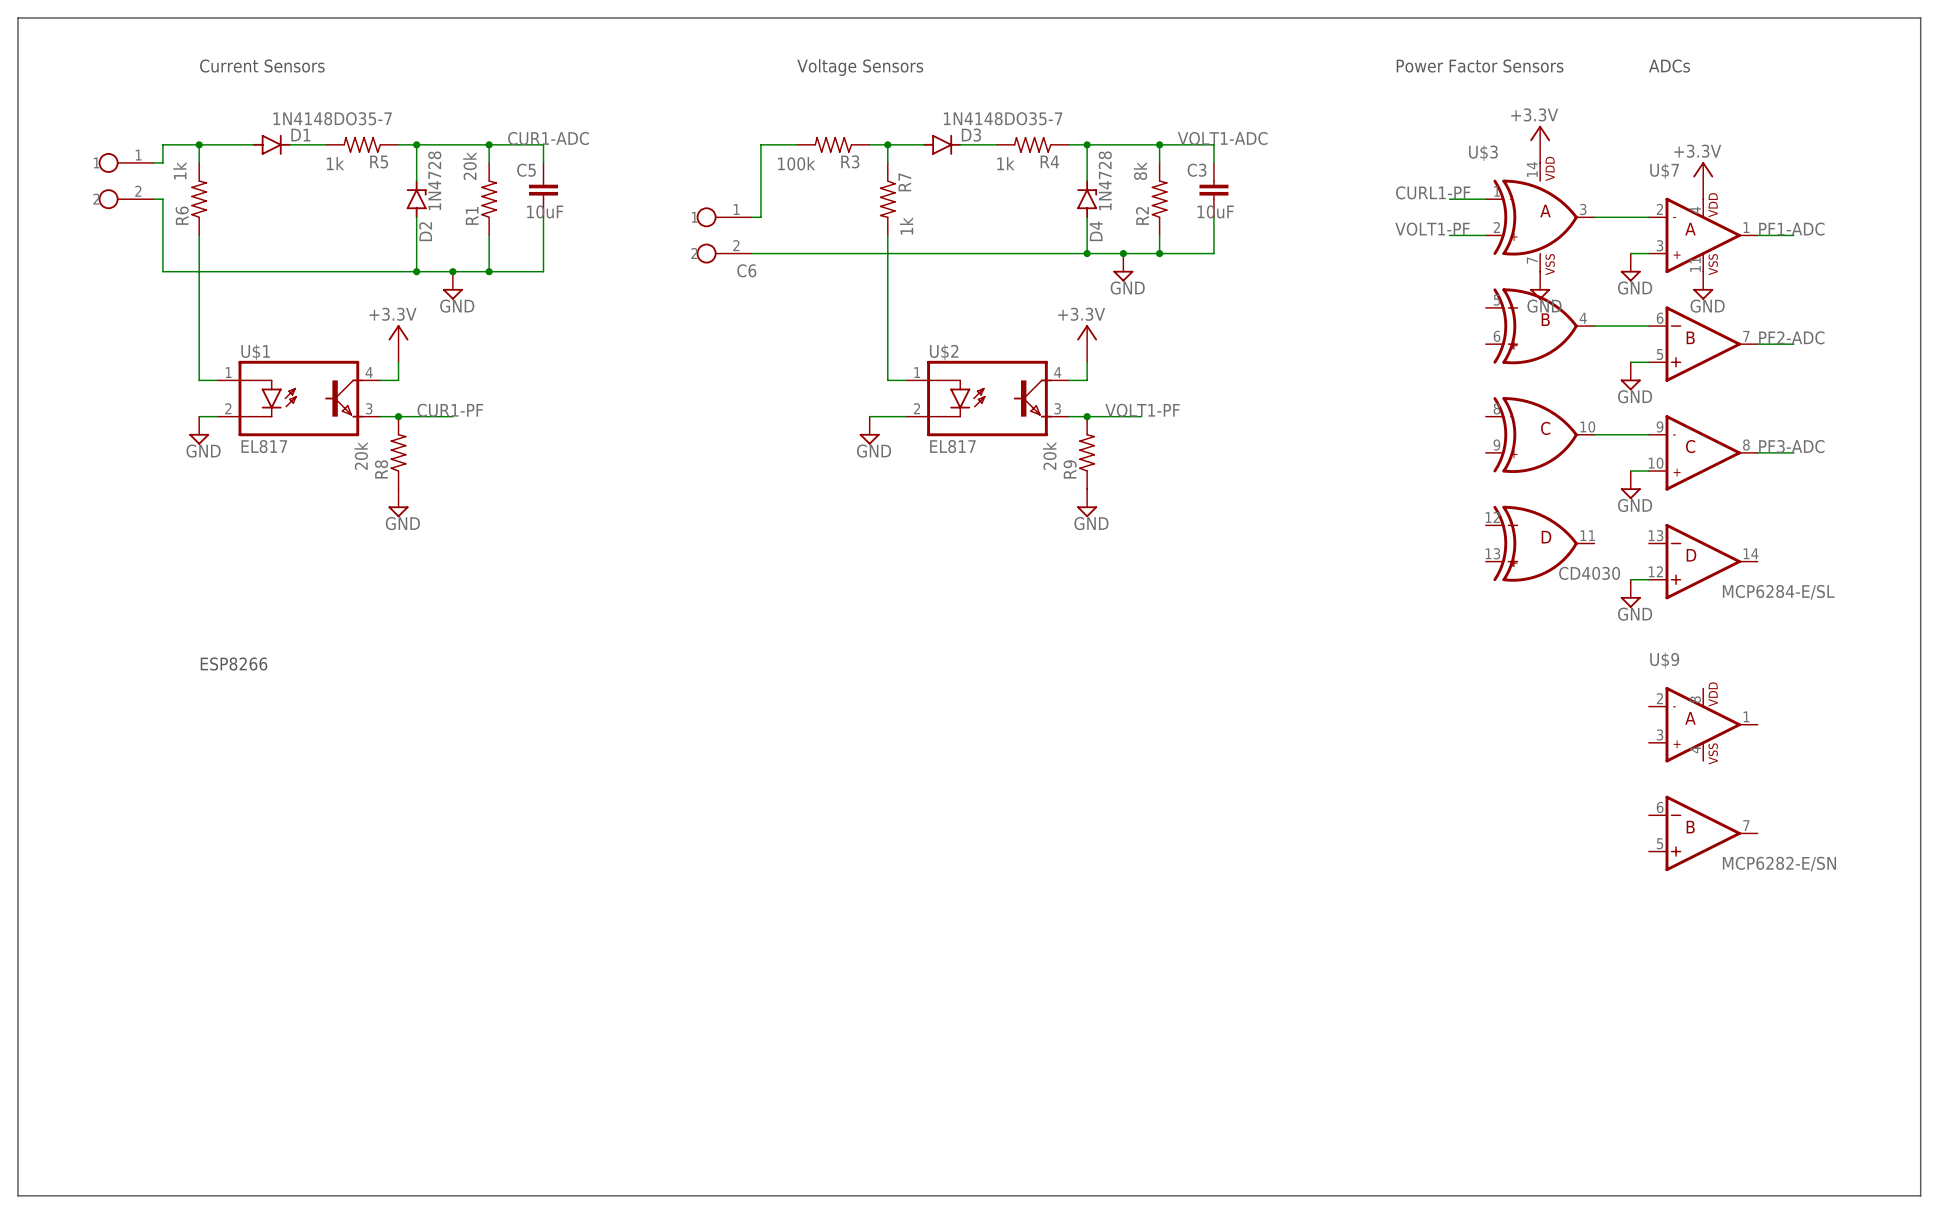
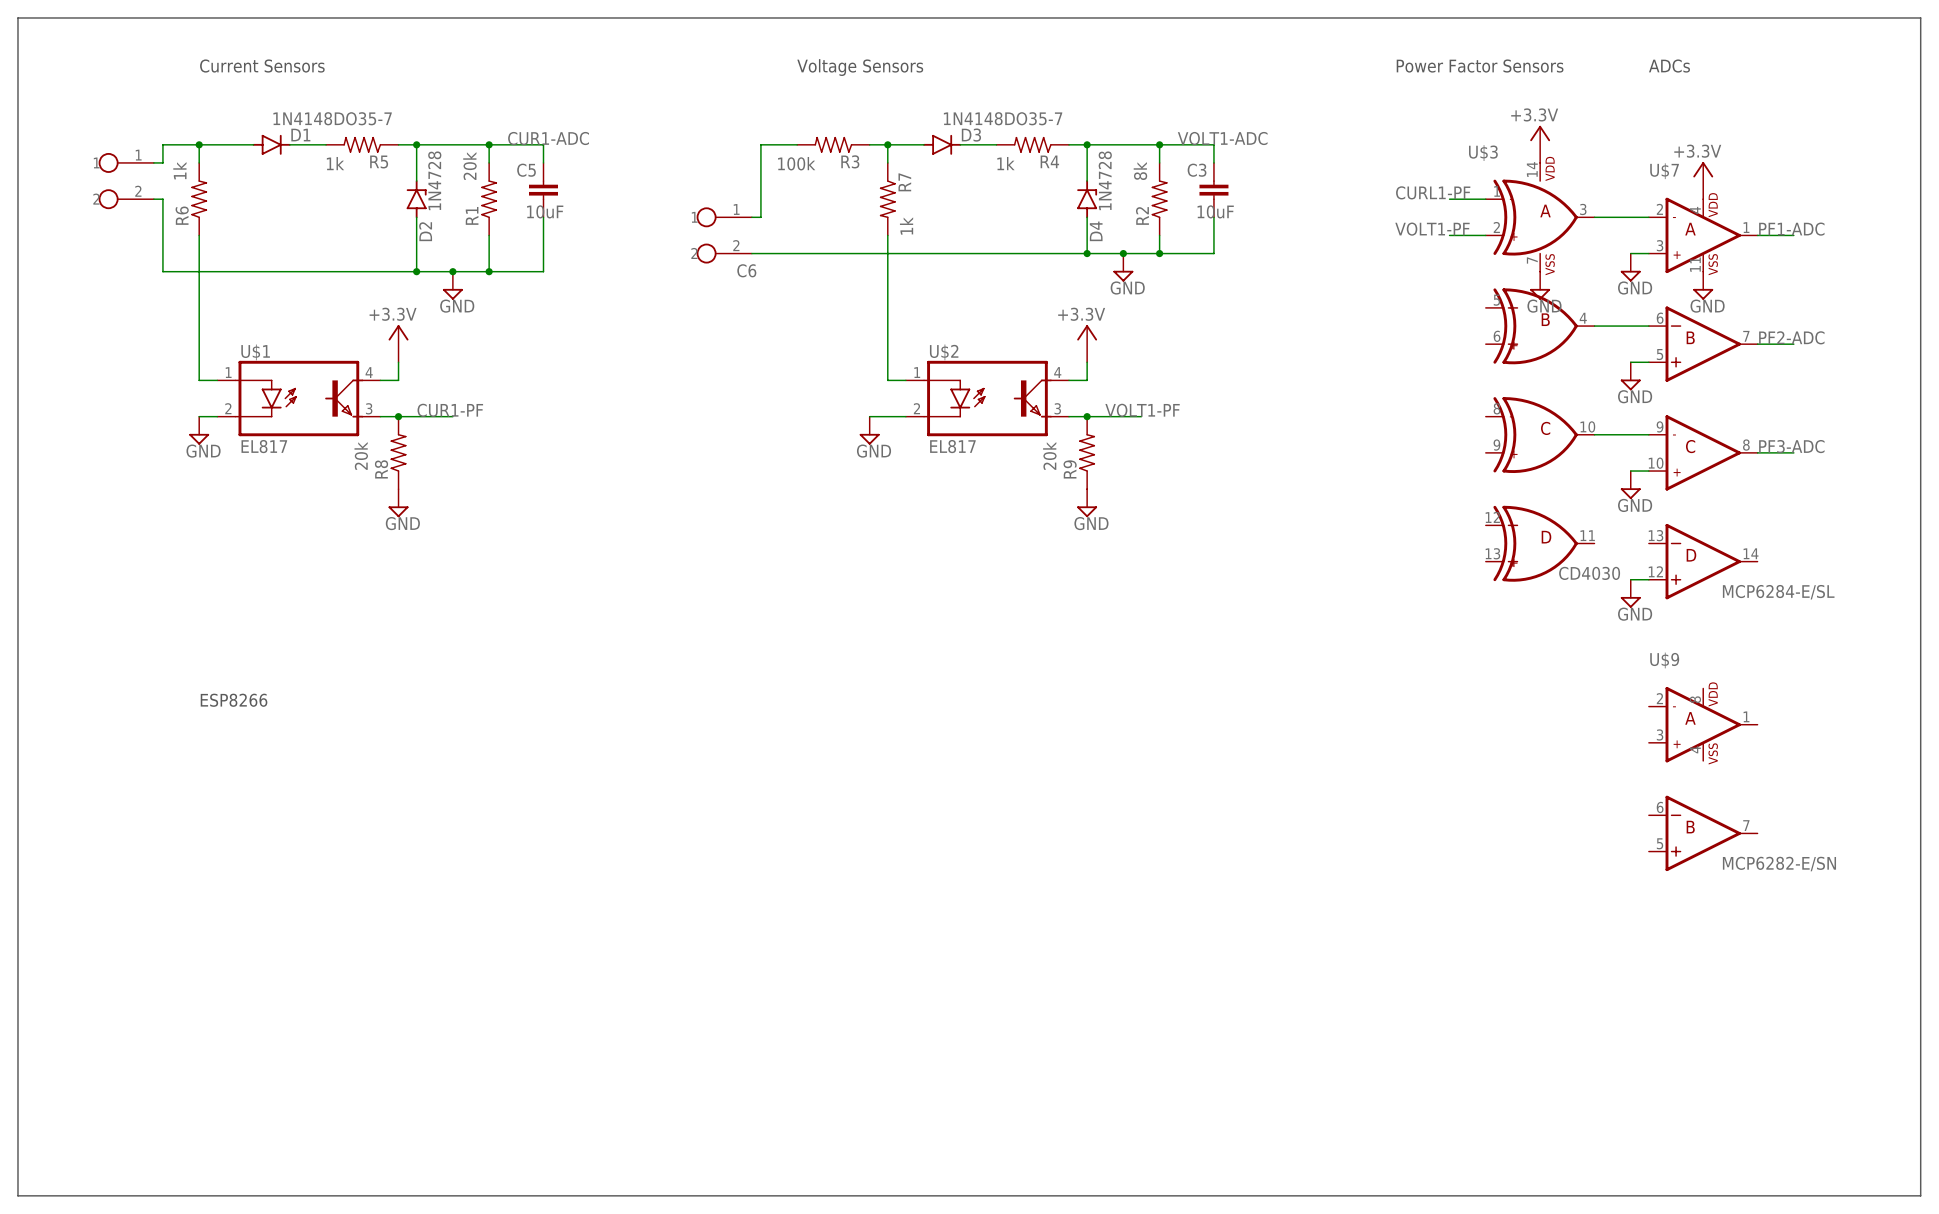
text position: ESP8266 (234, 664) -> ESP8266 (234, 700)

